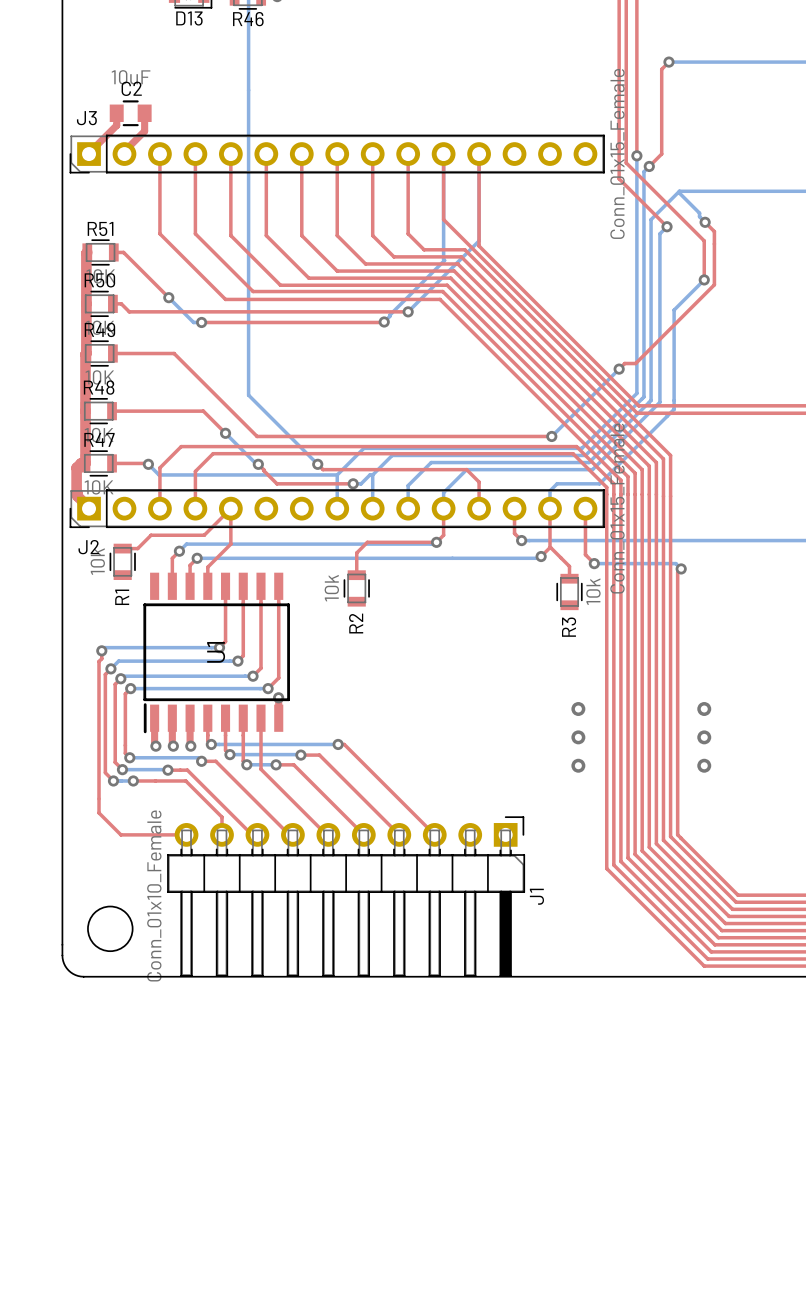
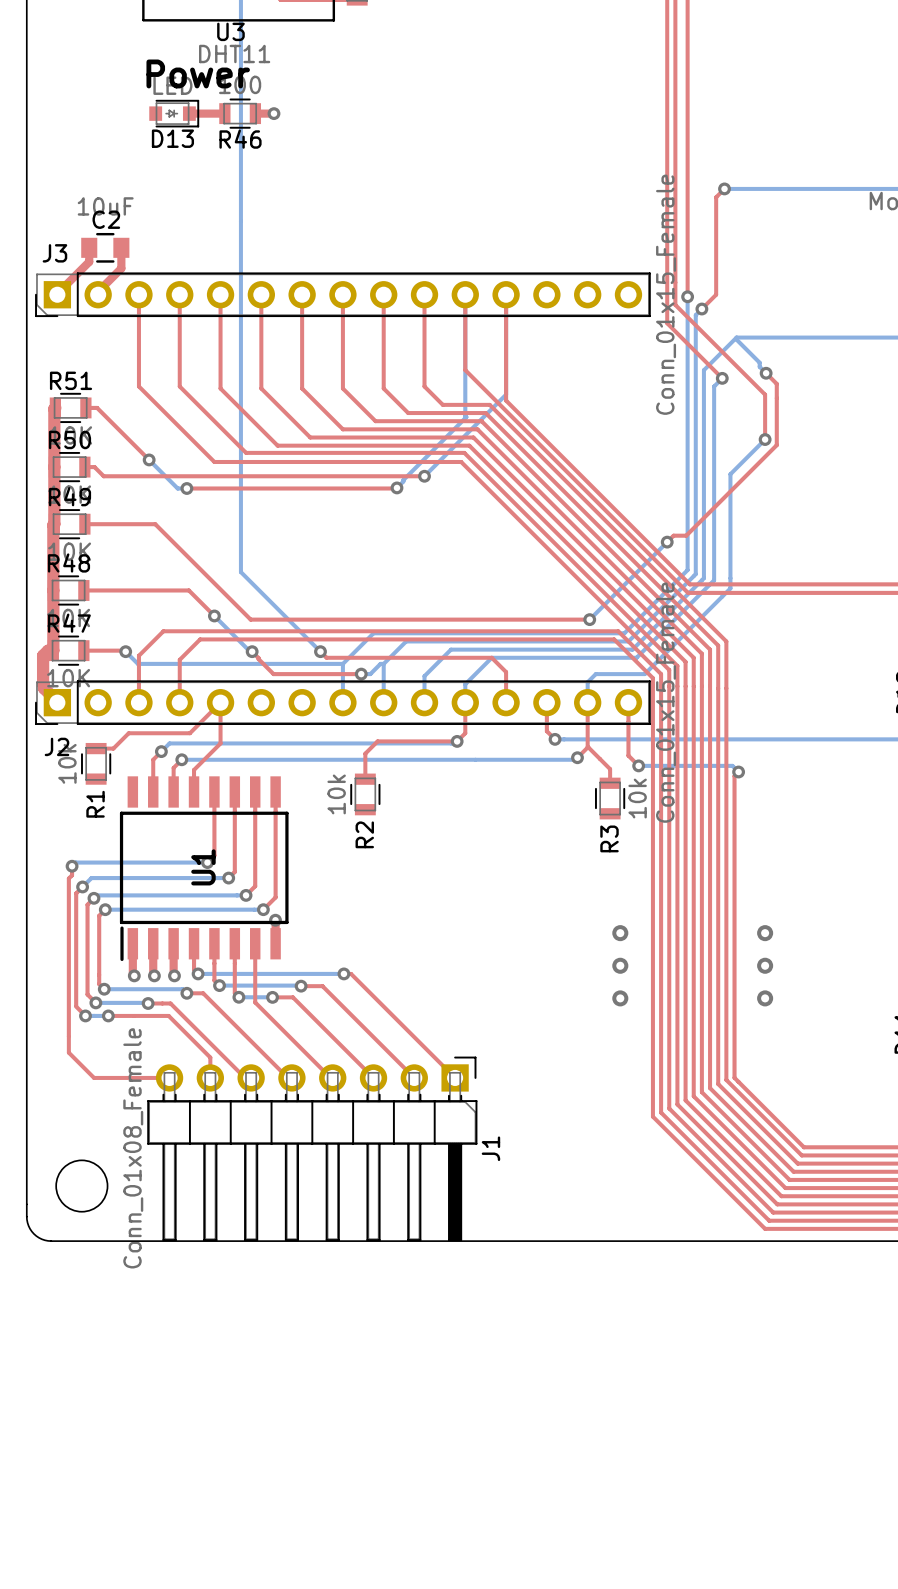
J1 footprint: [167, 816, 526, 977] -> [147, 1056, 478, 1242]
J1 value: Conn_01x10_Female (154, 895) -> Conn_01x08_Female (133, 1148)
J1 name position: J1 (536, 896) -> J1 (490, 1148)

